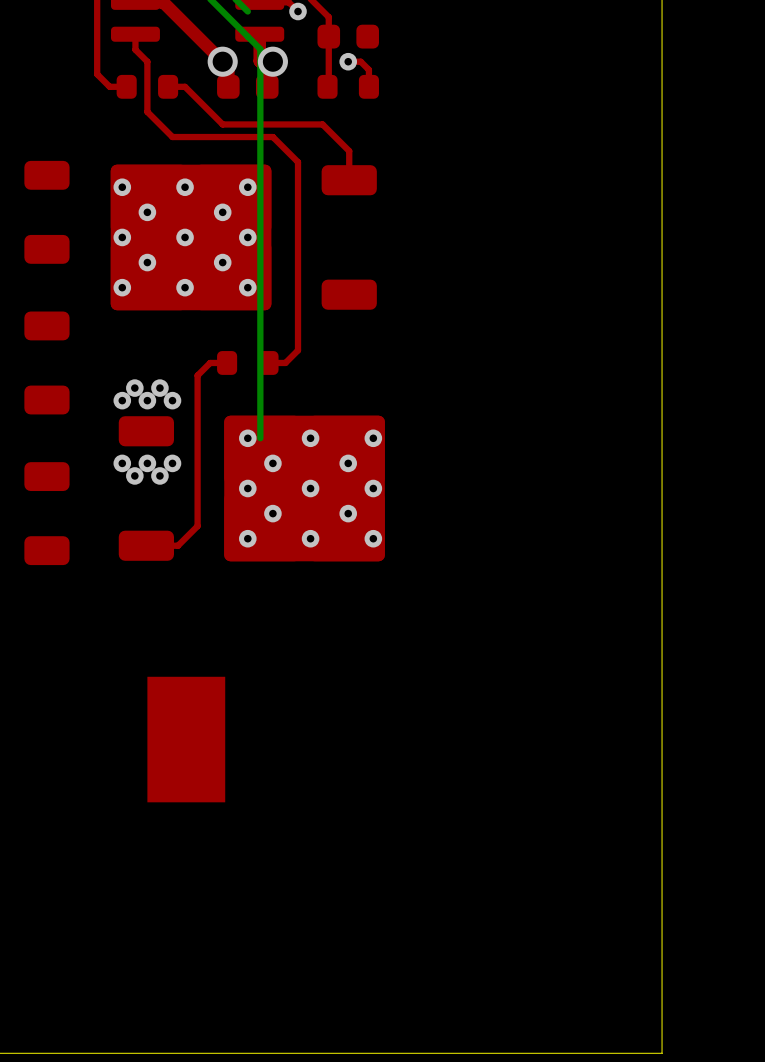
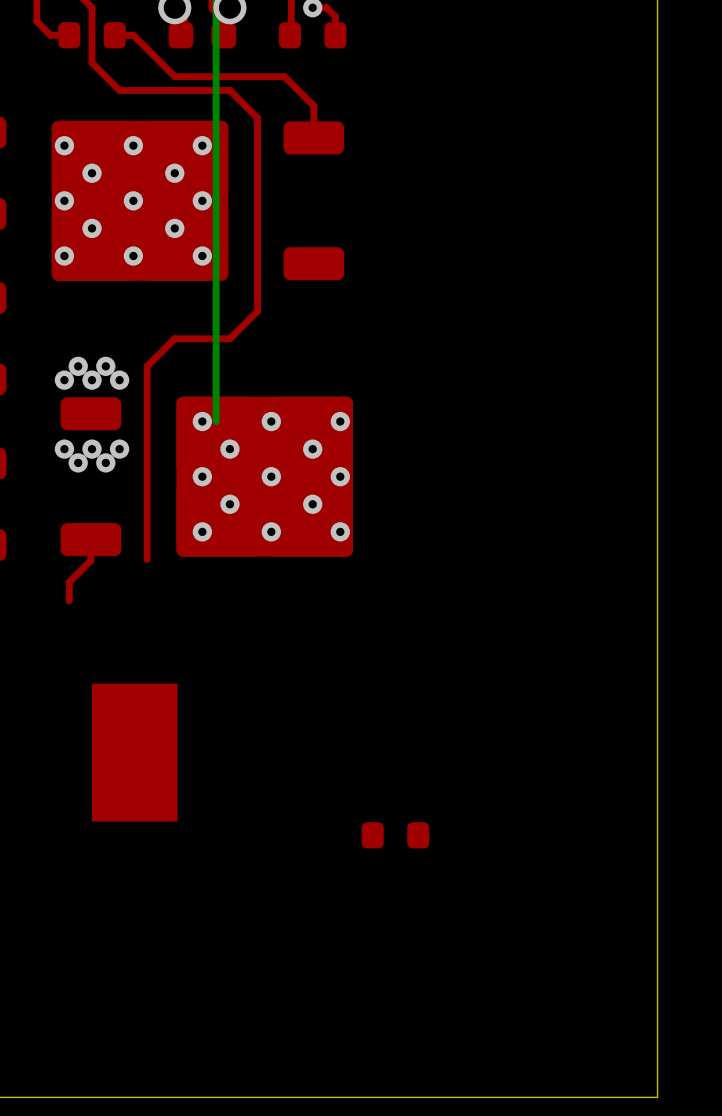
top track: (298, 337) (298, 350) (285, 362) (272, 362) -> (257, 311) (229, 338) (174, 338) (147, 366)
top track: (222, 362) (210, 362) (197, 375) (197, 388) -> none
part position: (247, 362) -> (395, 835)
top track: (197, 526) (178, 545) (146, 545) -> (147, 518) (147, 559)
top track: none -> (90, 539) (90, 560) (69, 582) (69, 600)

